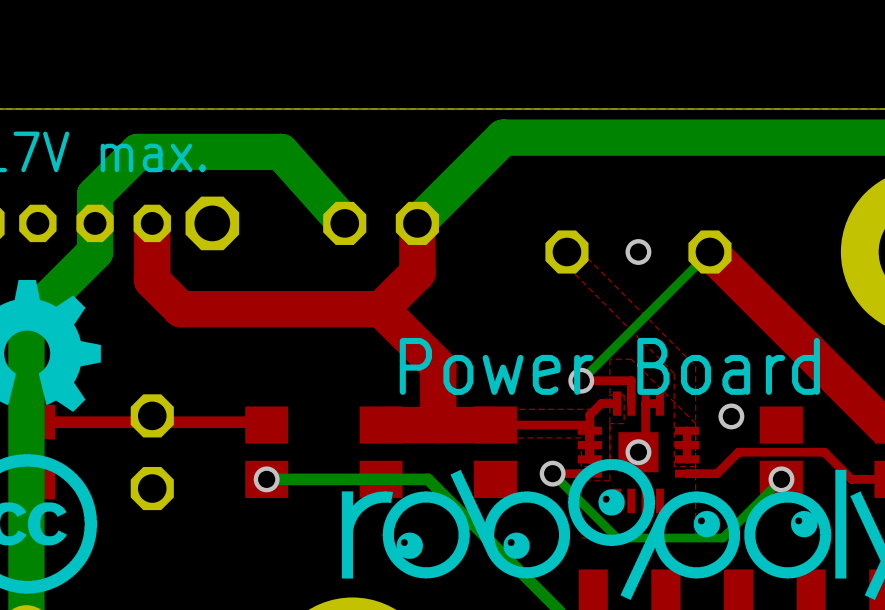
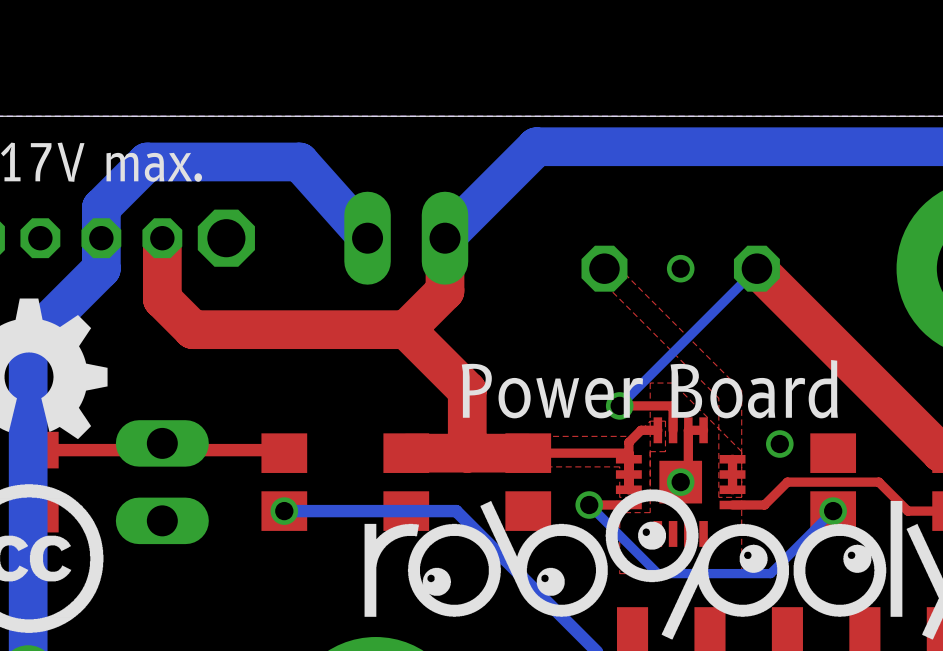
part footprint: [323, 201, 439, 245] -> [344, 191, 469, 285]
part footprint: [130, 394, 174, 511] -> [115, 420, 209, 545]

